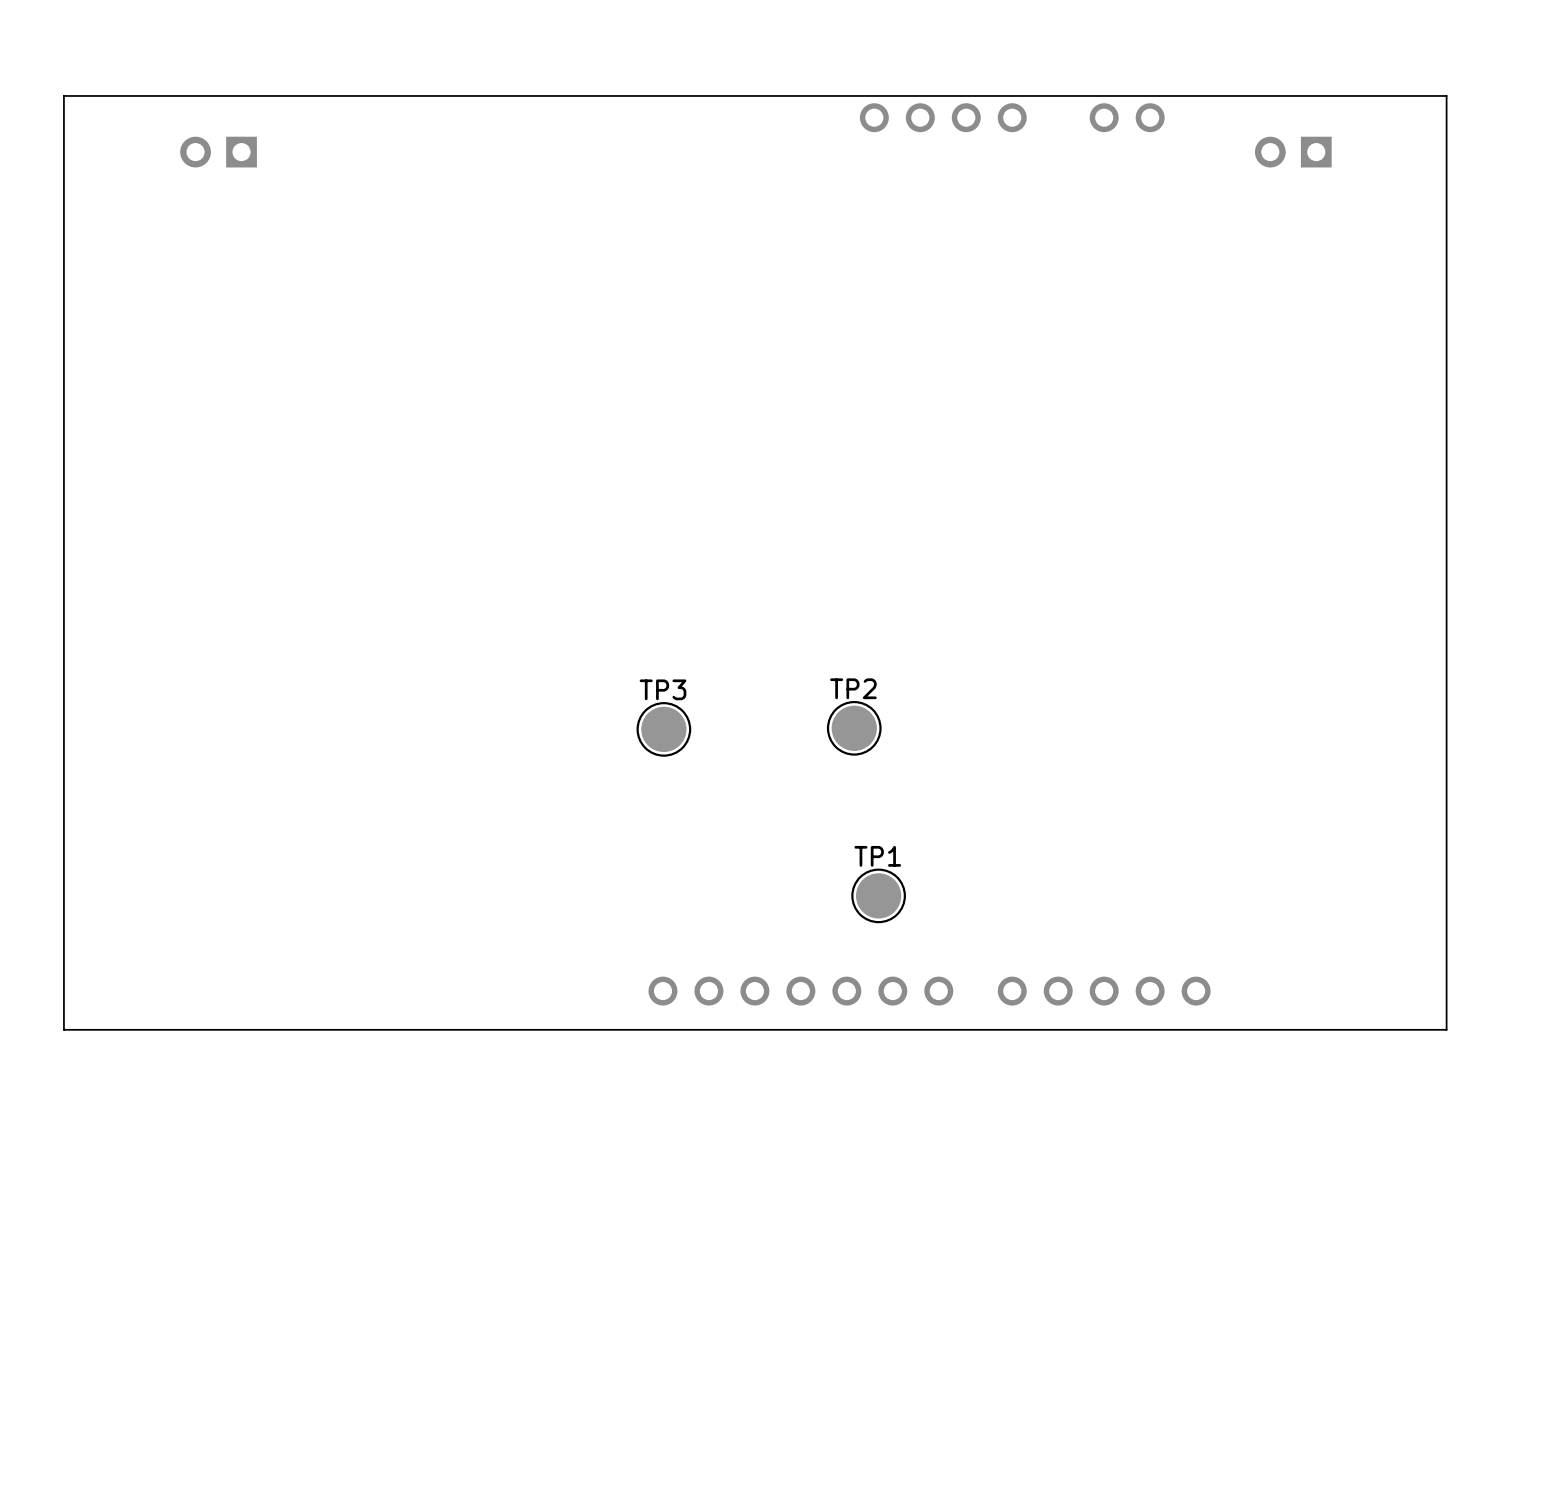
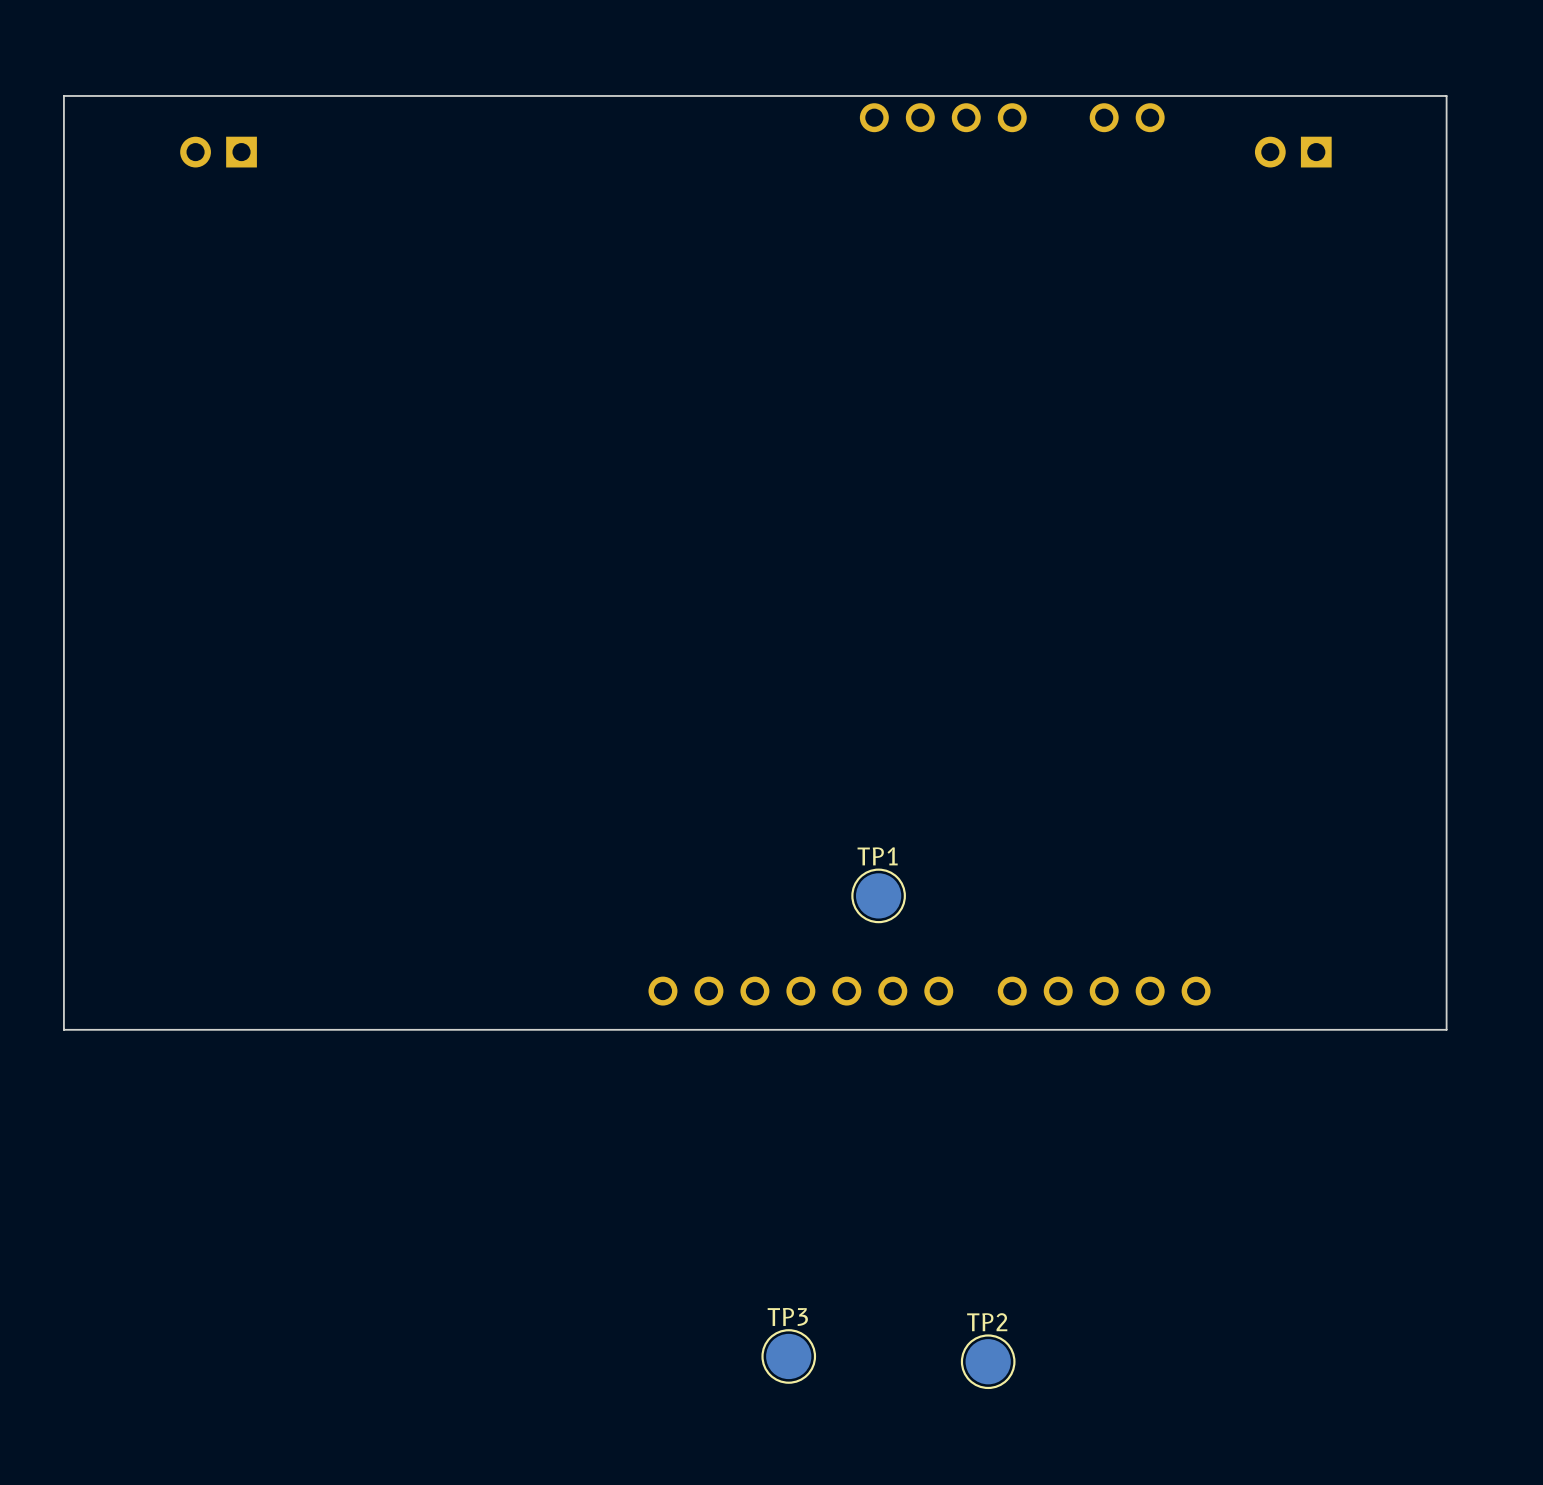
TP2 position: (854, 728) -> (988, 1361)
TP3 position: (663, 729) -> (788, 1356)

